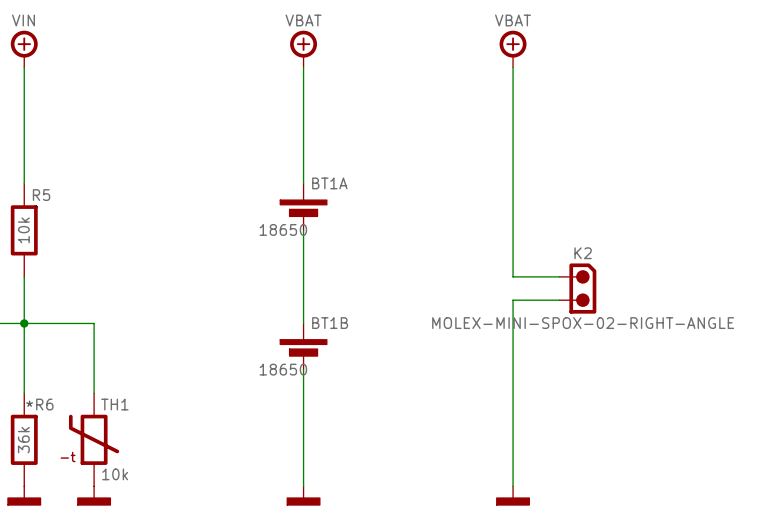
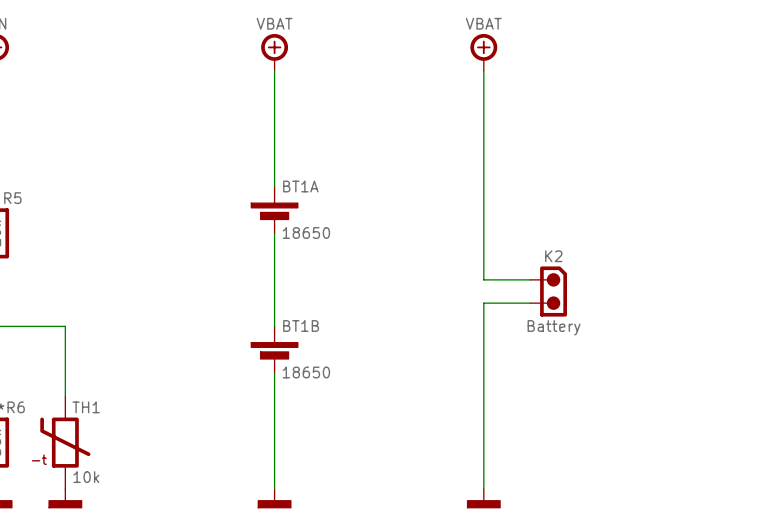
BT1A value position: 18650 (283, 229) -> 18650 (306, 233)
K2 value: MOLEX-MINI-SPOX-02-RIGHT-ANGLE (583, 323) -> Battery (554, 327)
BT1B value position: 18650 (283, 369) -> 18650 (306, 372)

